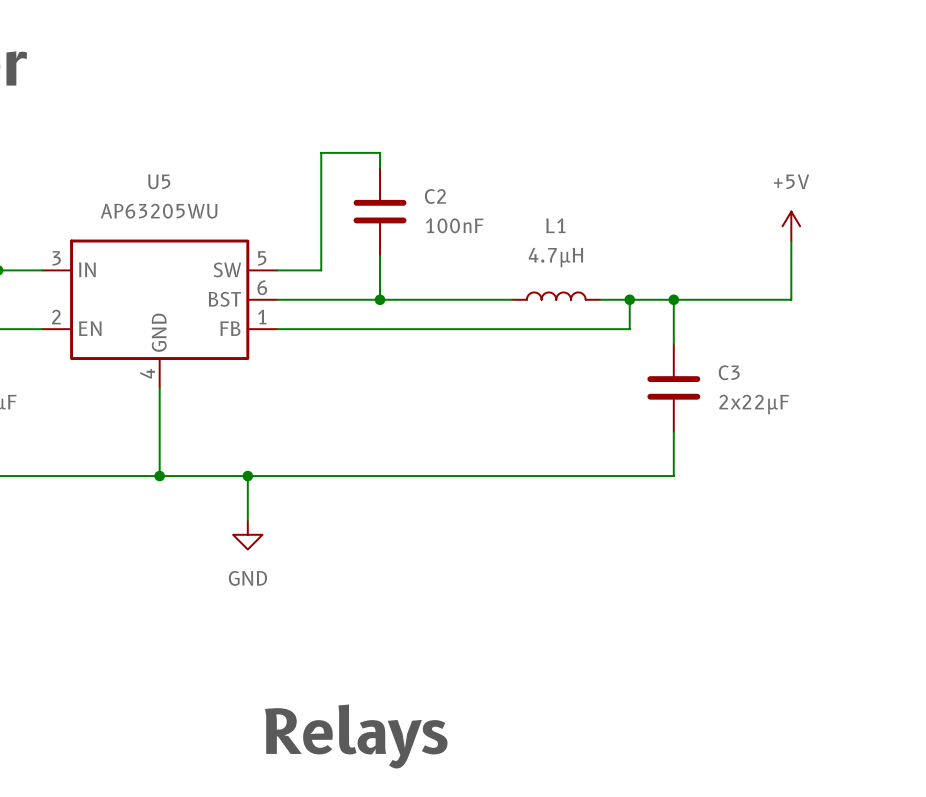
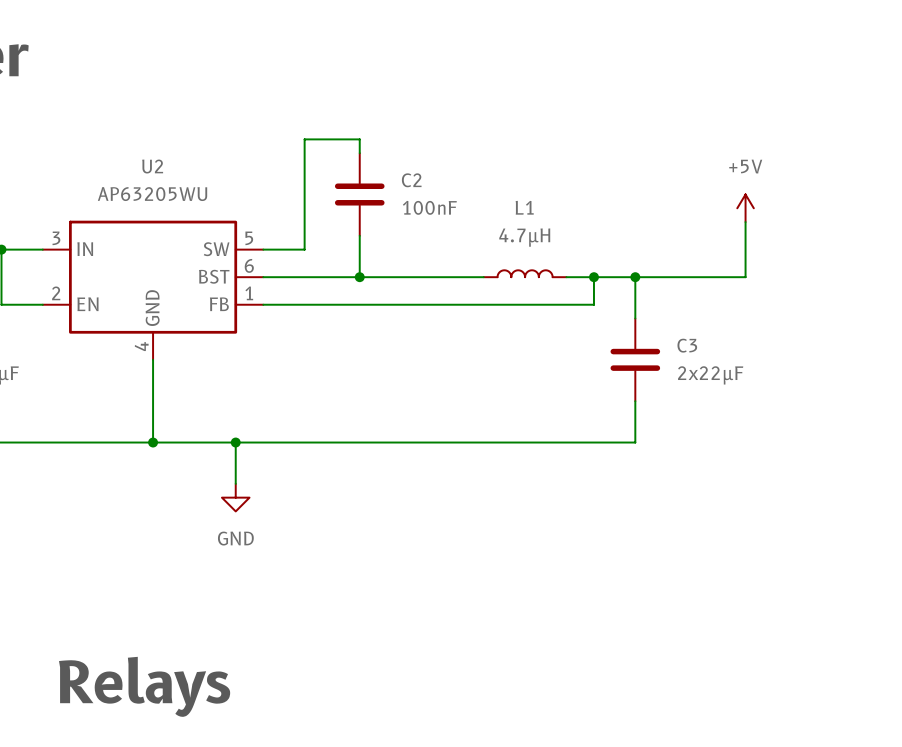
U5 name: U5 (159, 181) -> U2 (152, 166)
text position: Relays (356, 736) -> Relays (144, 686)

